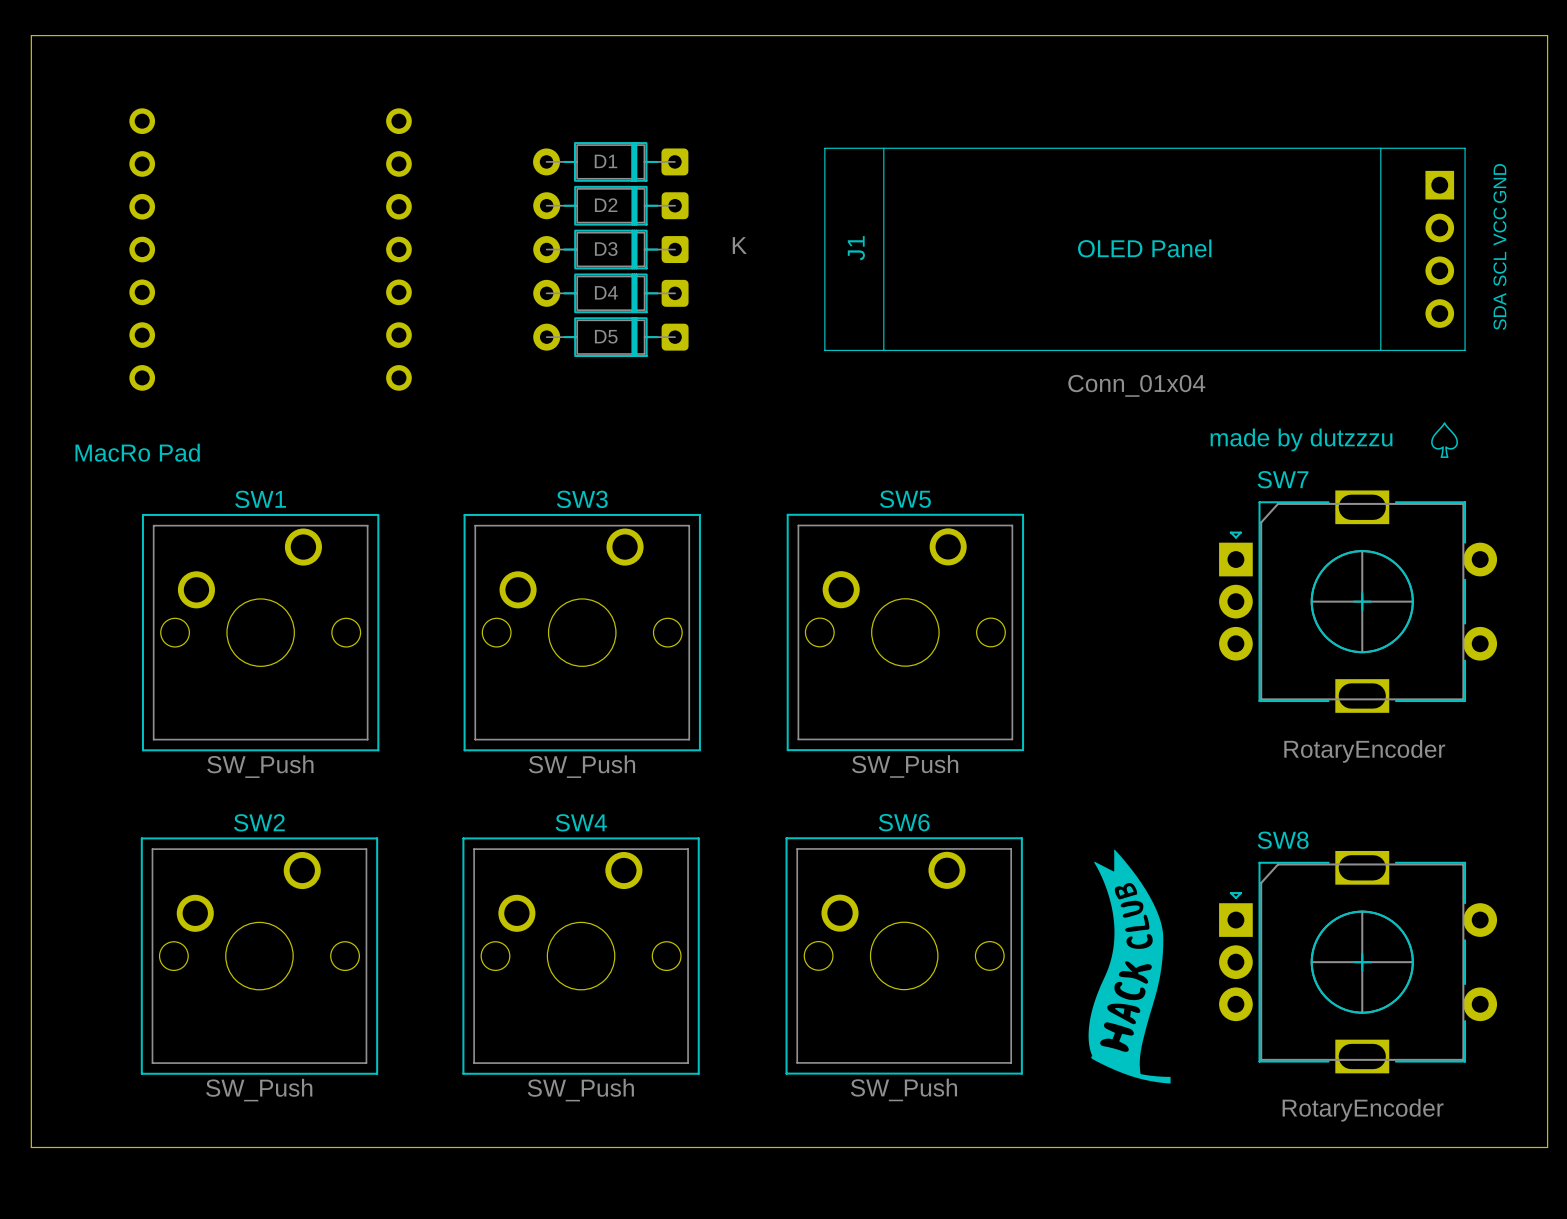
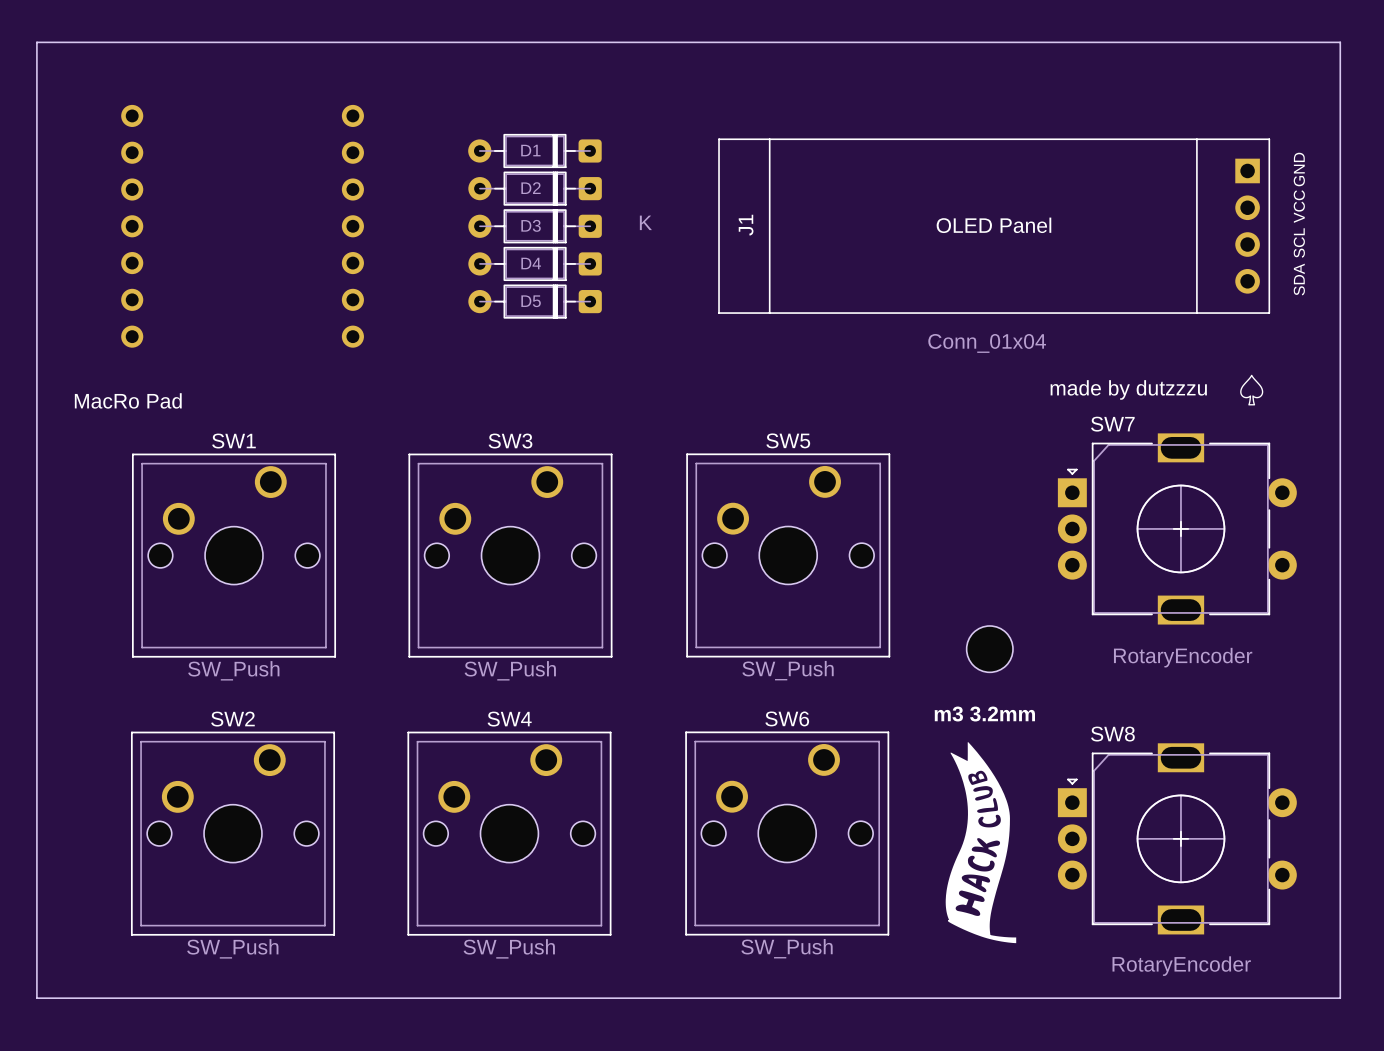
part: none -> (989, 649)
text: none -> m3 3.2mm (984, 714)

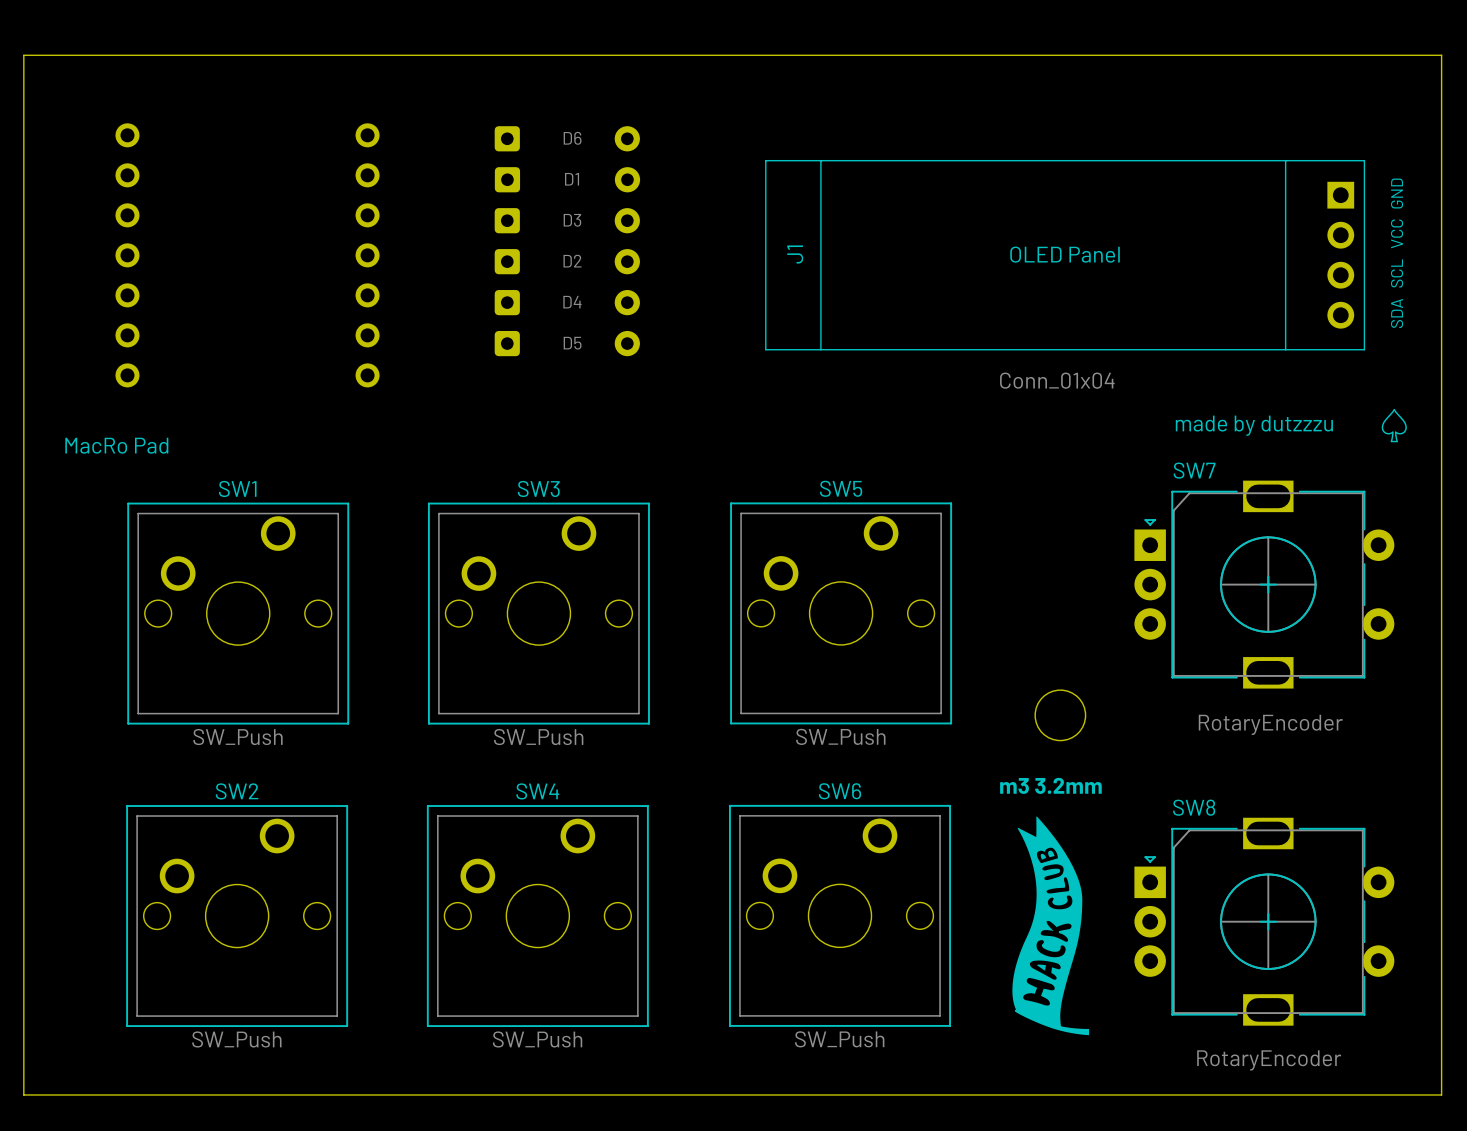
D6: none -> (567, 138)
D1 side: top (534, 150) -> bottom (567, 179)
D2 side: top (535, 188) -> bottom (567, 261)
D3 side: top (535, 226) -> bottom (567, 220)
D4 side: top (535, 263) -> bottom (567, 302)
D5 side: top (535, 301) -> bottom (567, 343)
text position: made by dutzzzu (1128, 389) -> made by dutzzzu (1254, 425)
drawing position: (1251, 390) -> (1394, 425)

